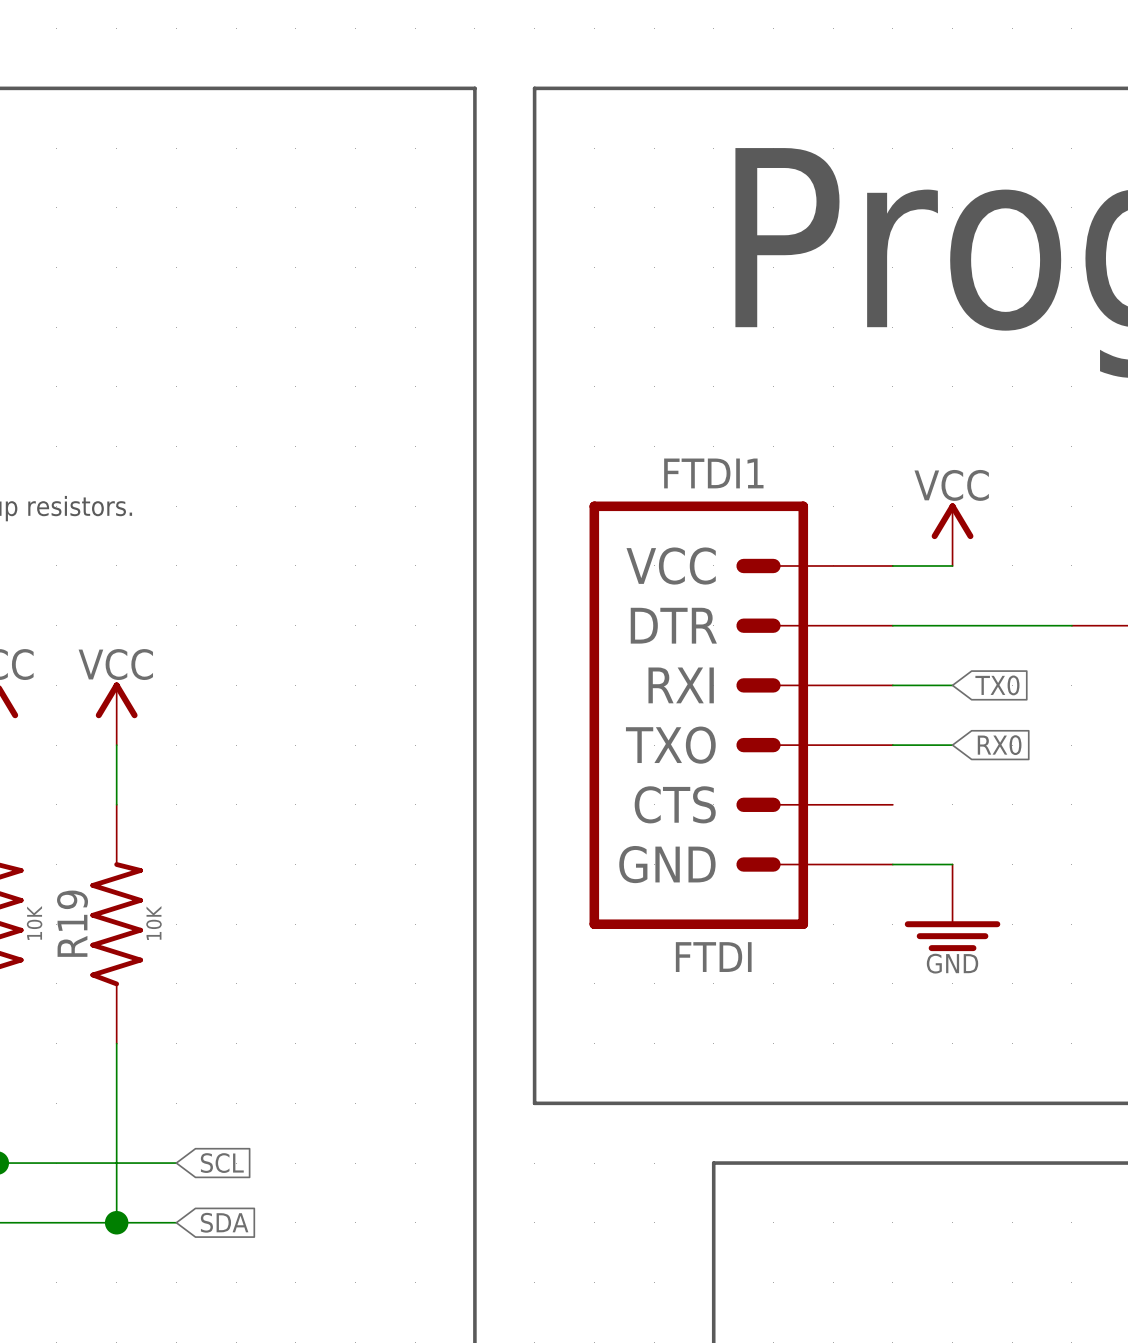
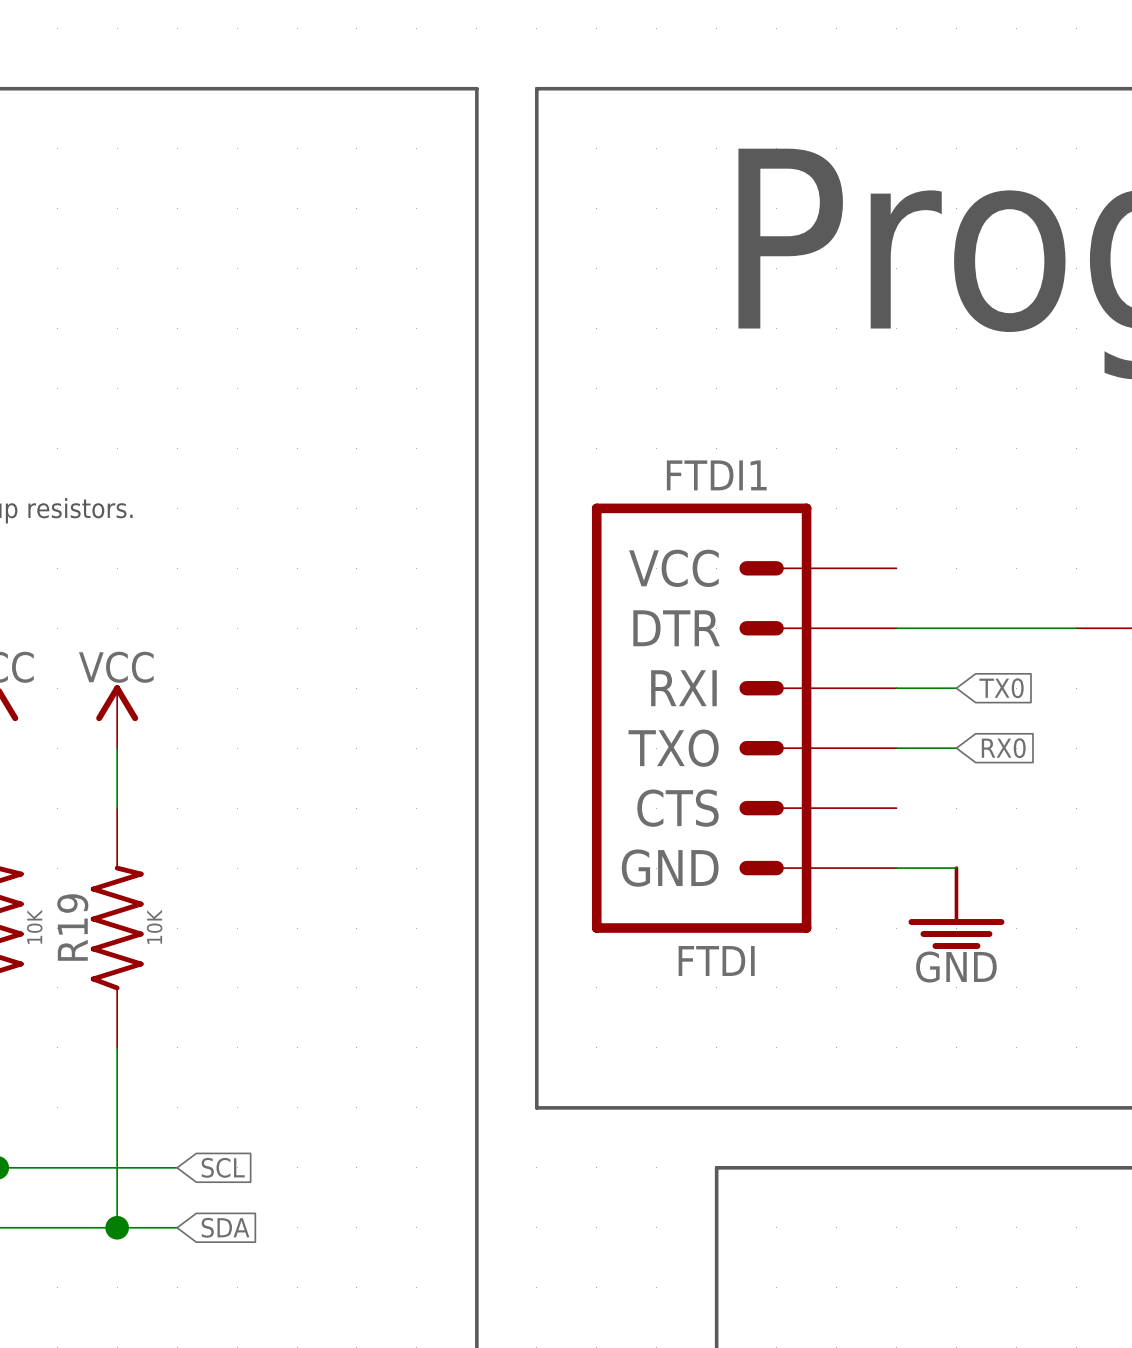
power symbol: (952, 534) -> none
wire: (892, 565) (952, 565) -> none
power symbol shape: [904, 864, 1001, 952] -> [908, 866, 1005, 950]

